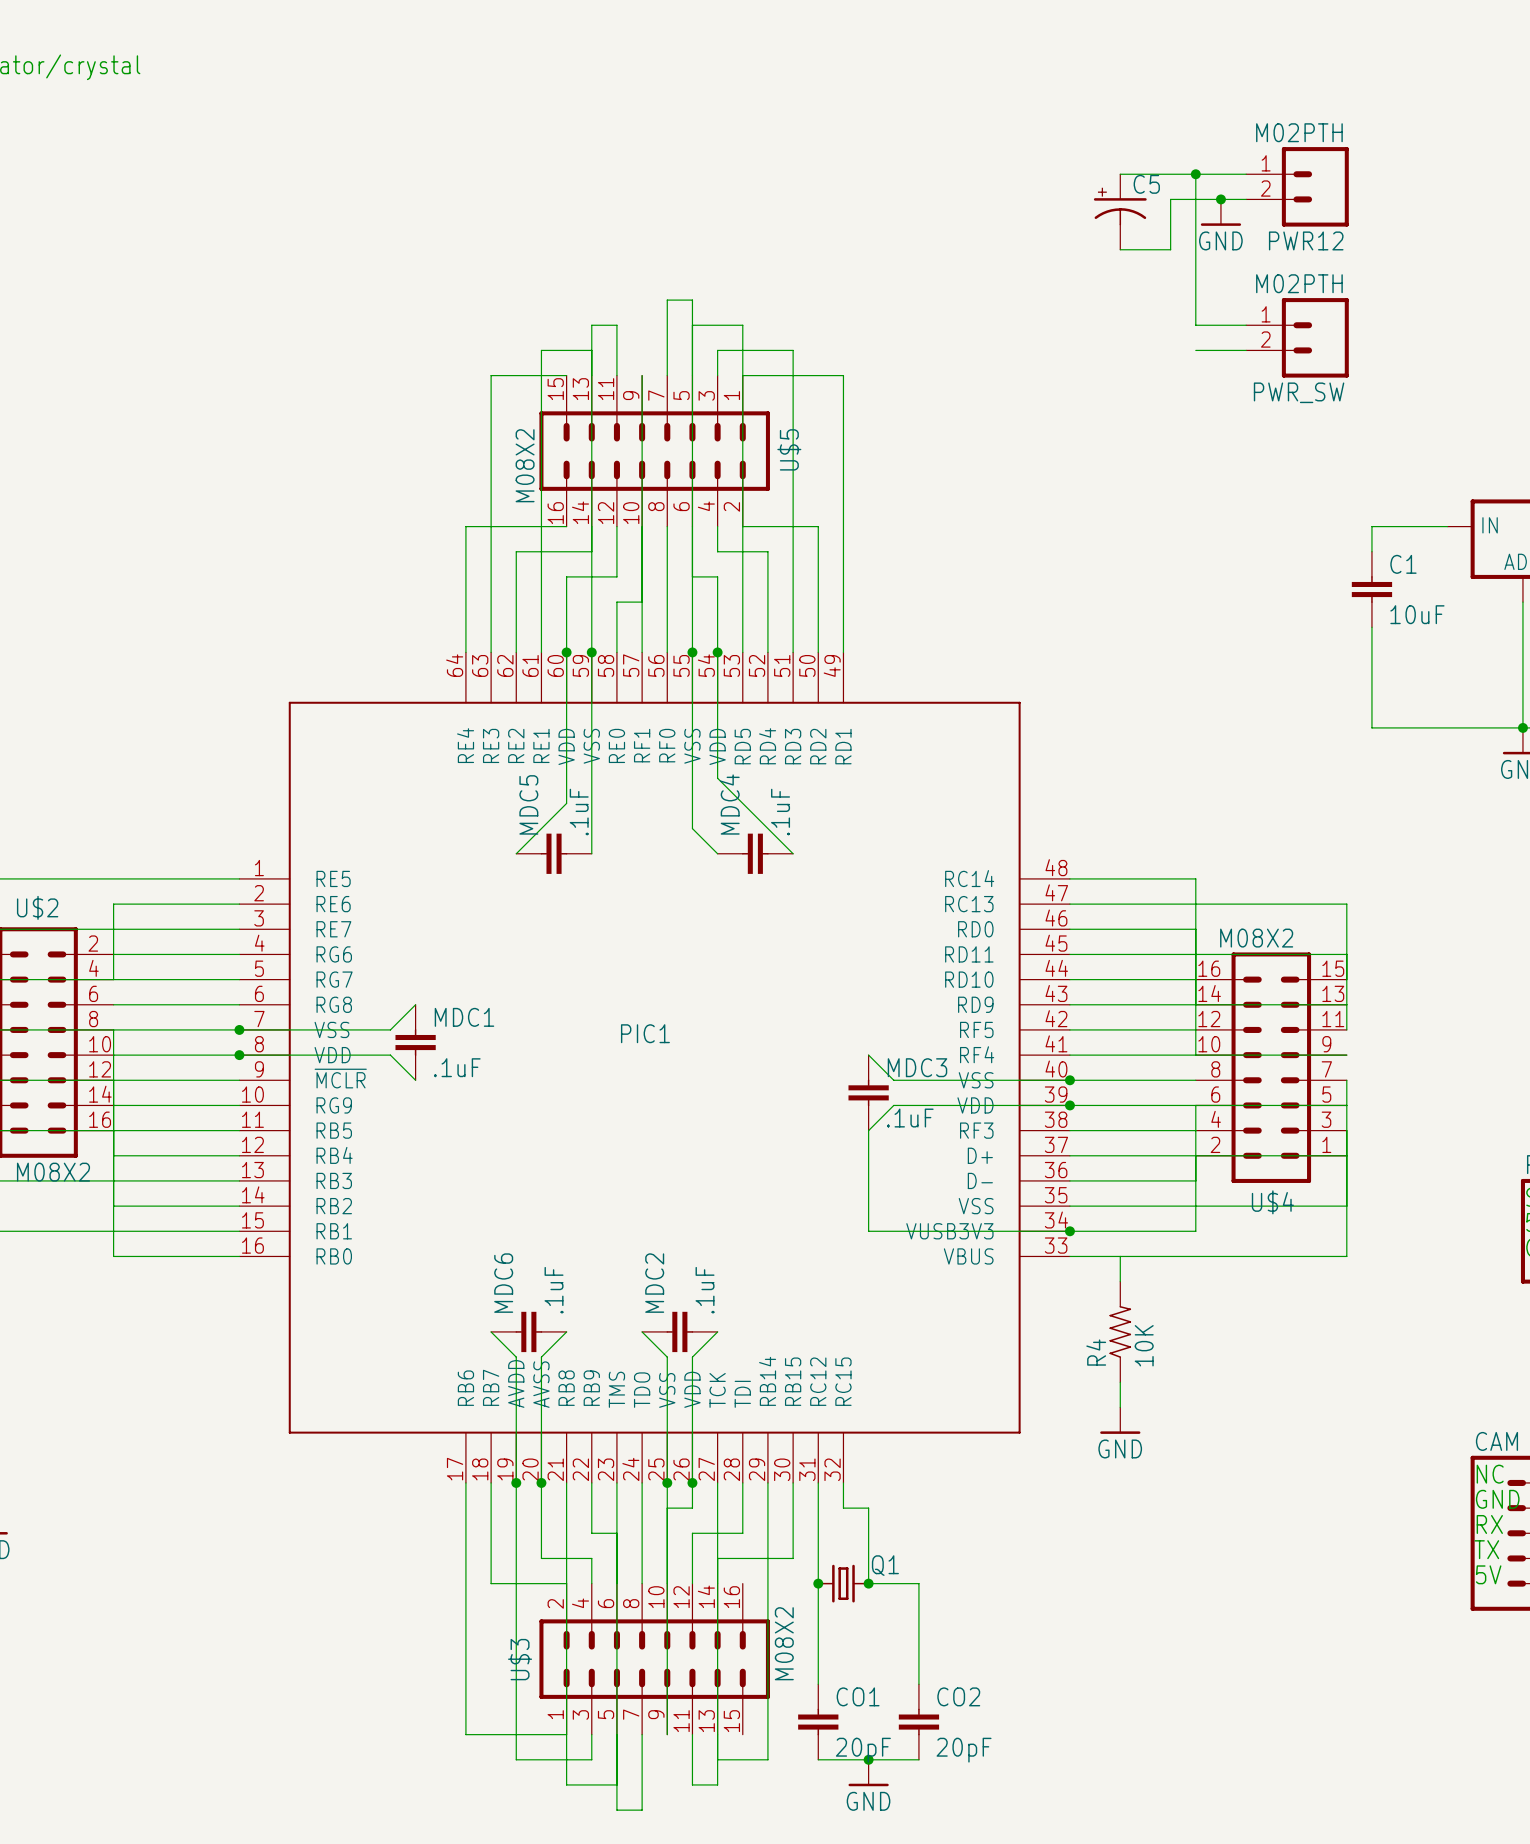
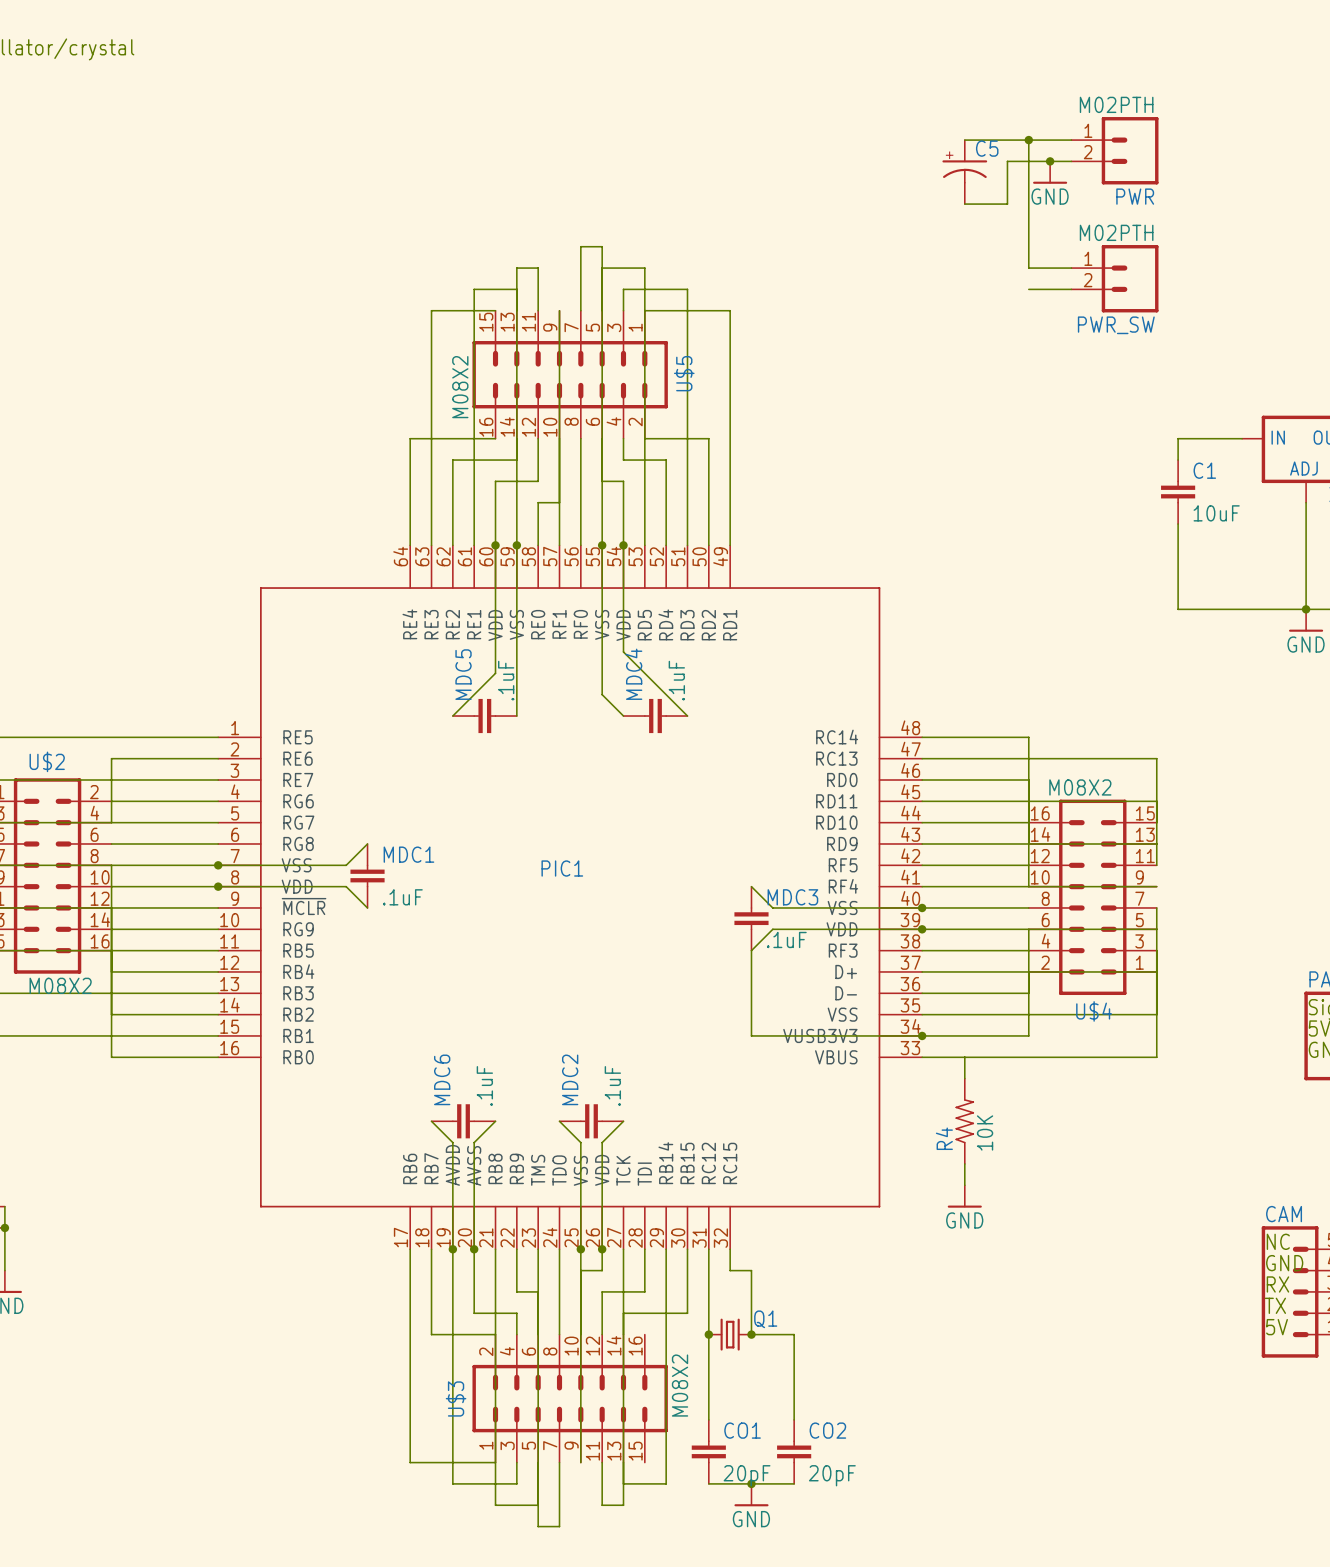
PWR12 name: PWR12 (1306, 240) -> PWR (1135, 196)

